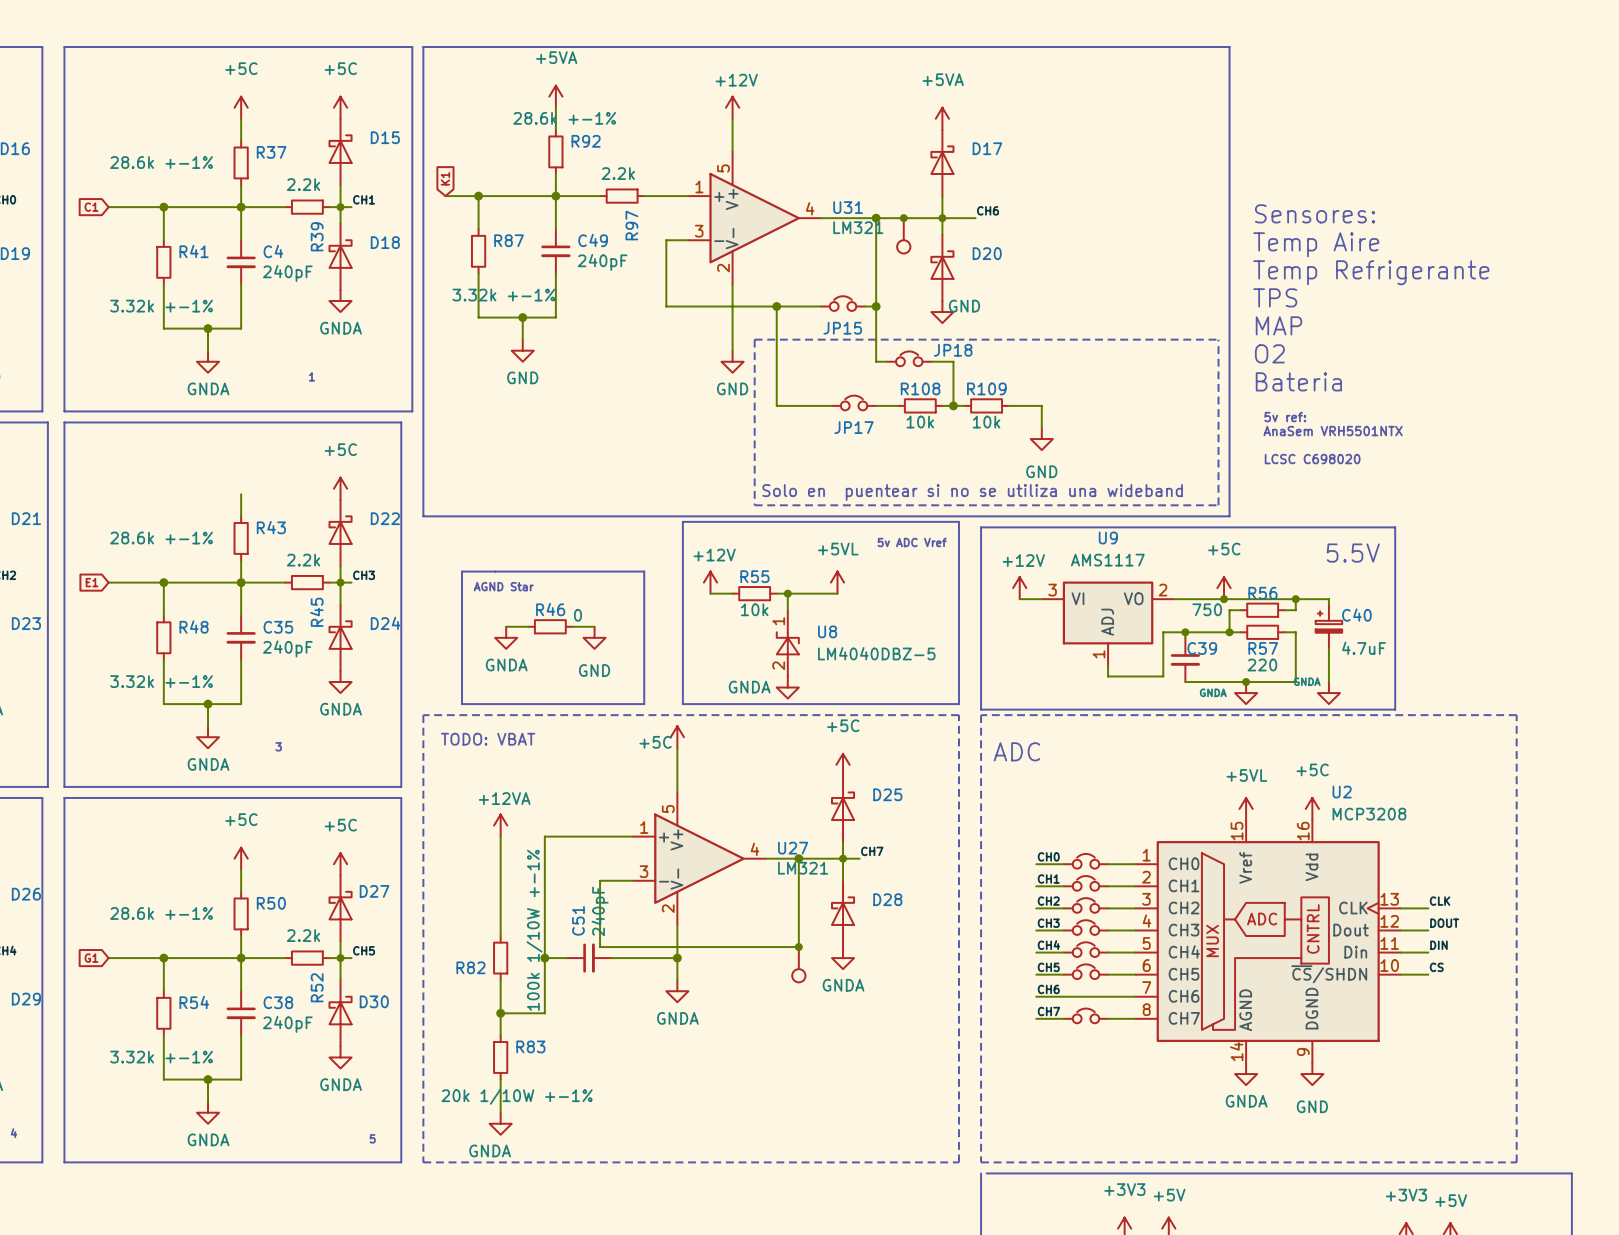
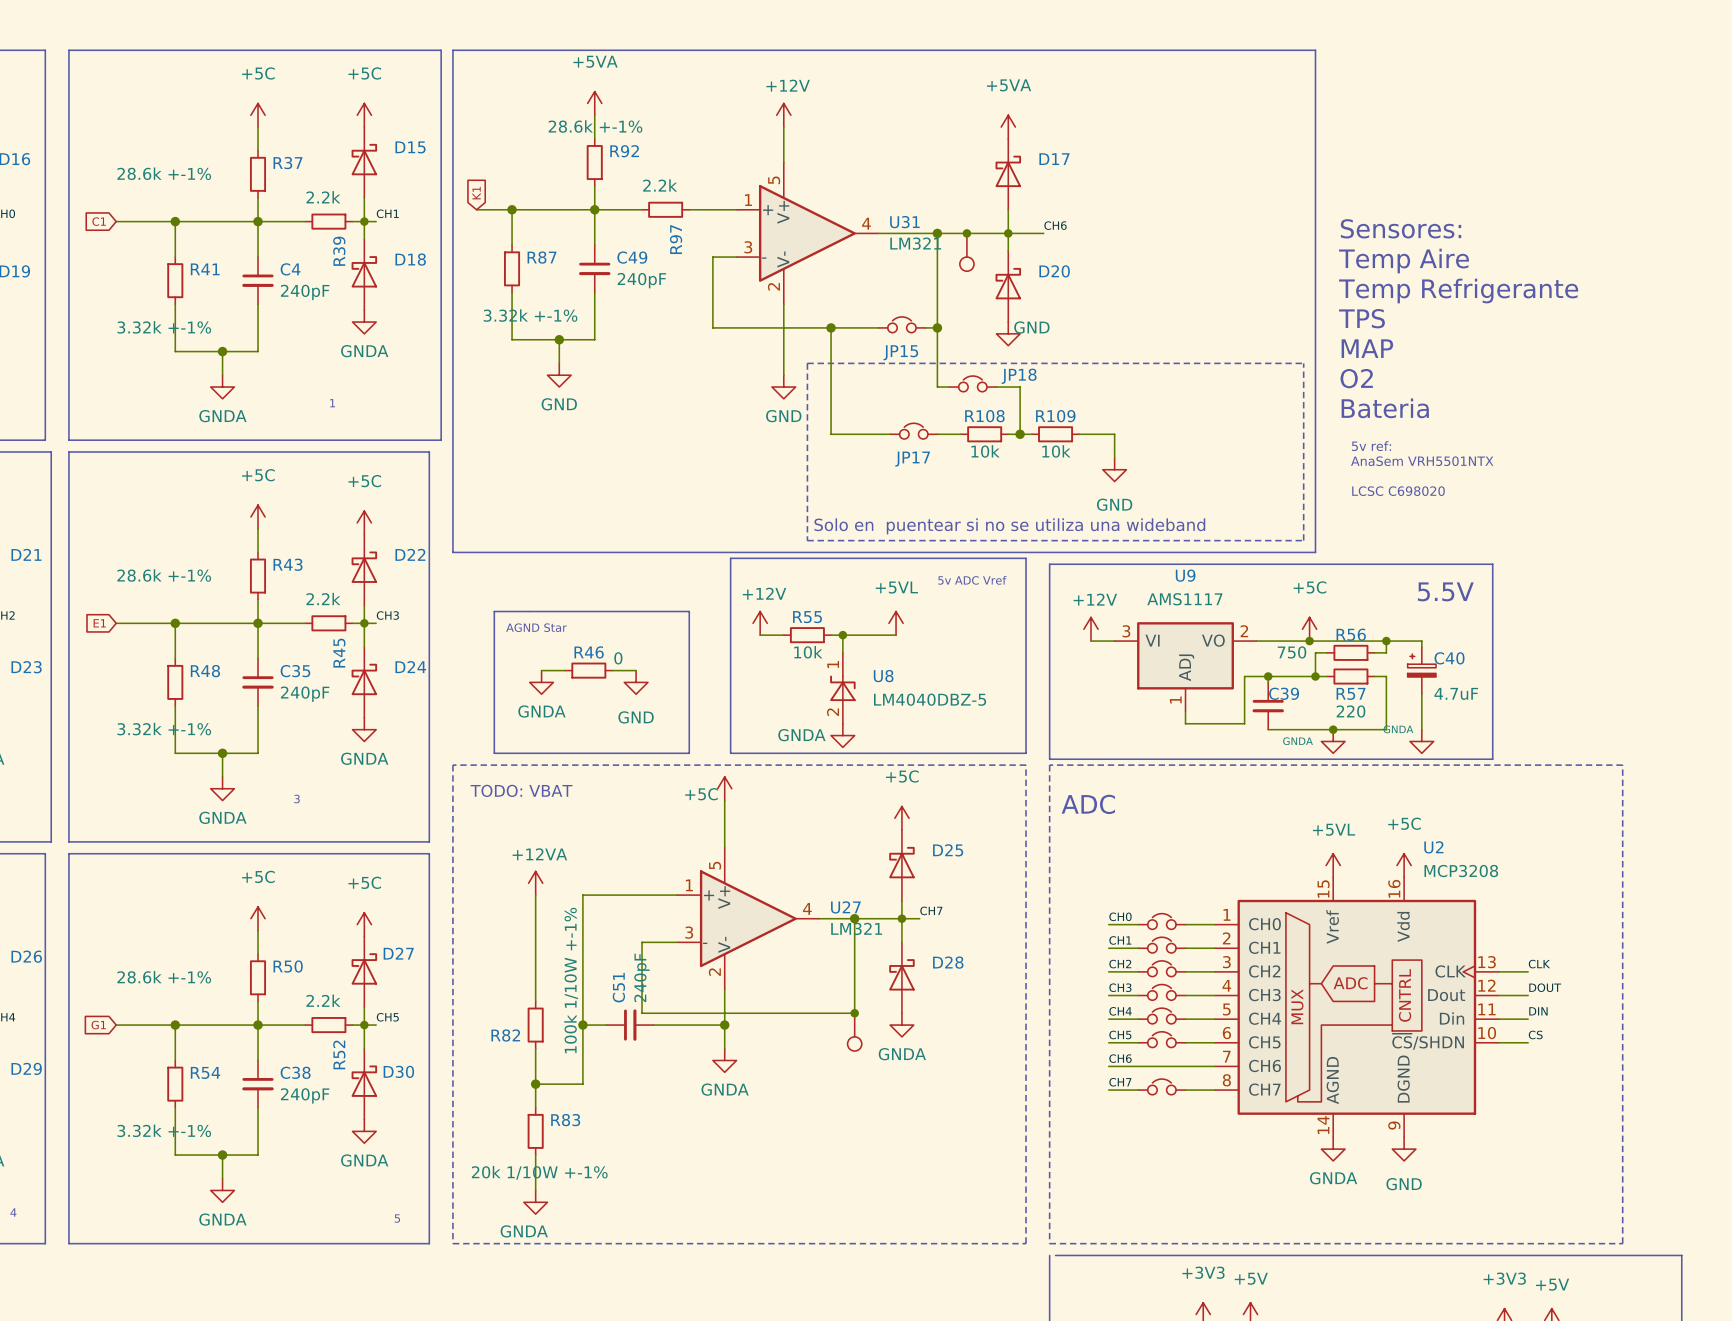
power symbol: none -> +5C (258, 516)

